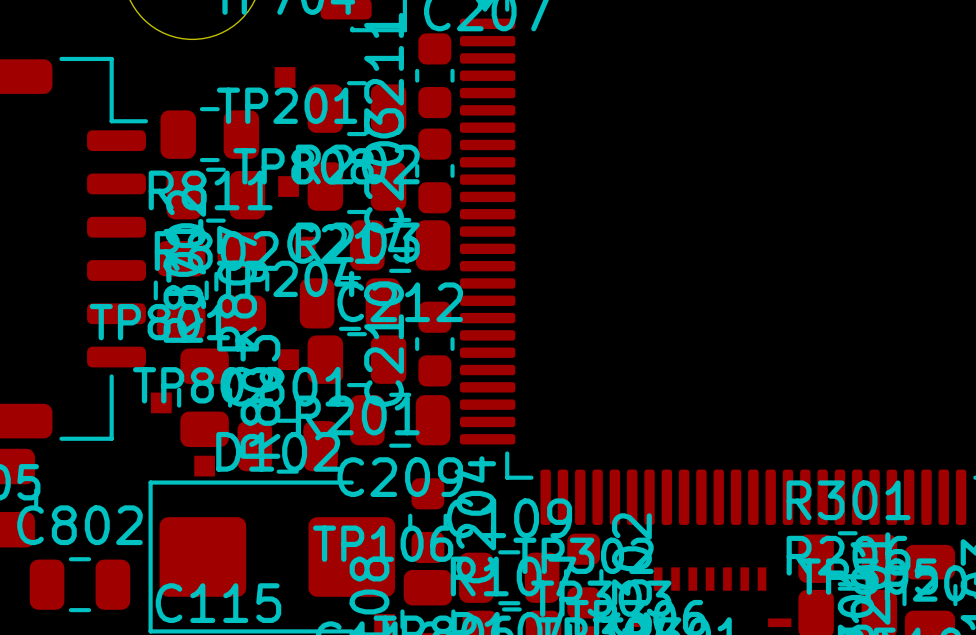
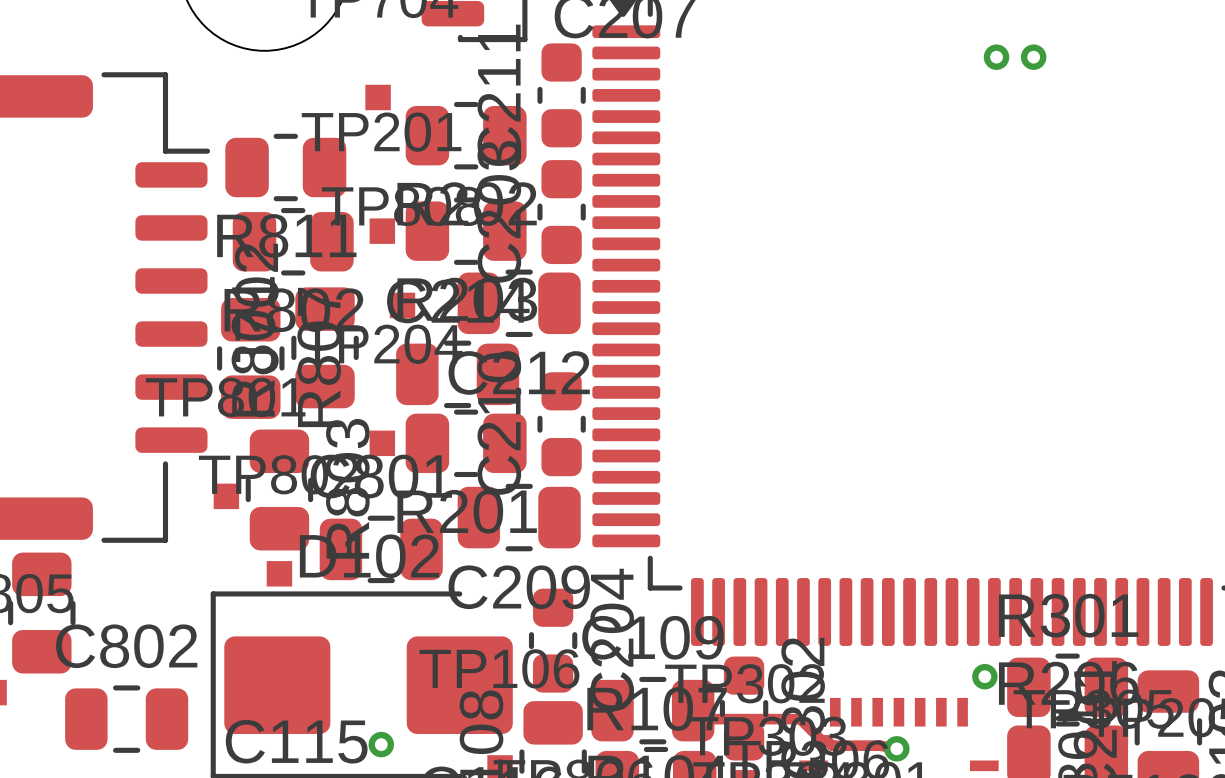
via: none -> (996, 57)
via: none -> (1033, 57)
via: none -> (984, 676)
track: none -> (693, 710) (710, 719) (800, 719) (821, 740) (826, 740) (832, 745) (879, 745) (896, 748)
via: none -> (381, 744)
via: none -> (896, 748)

